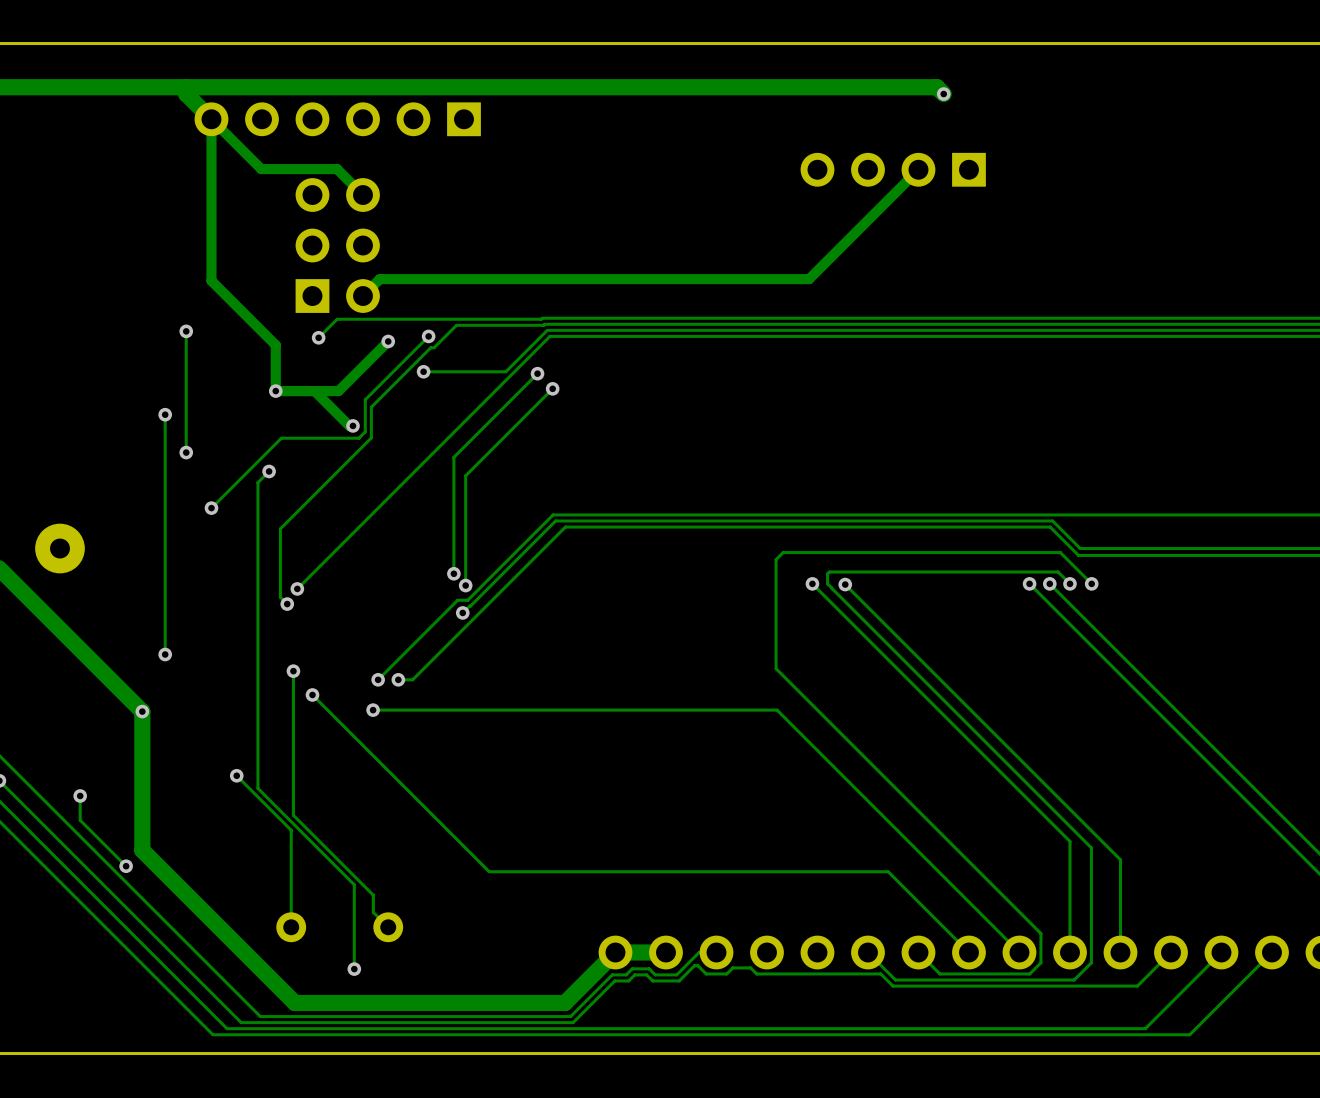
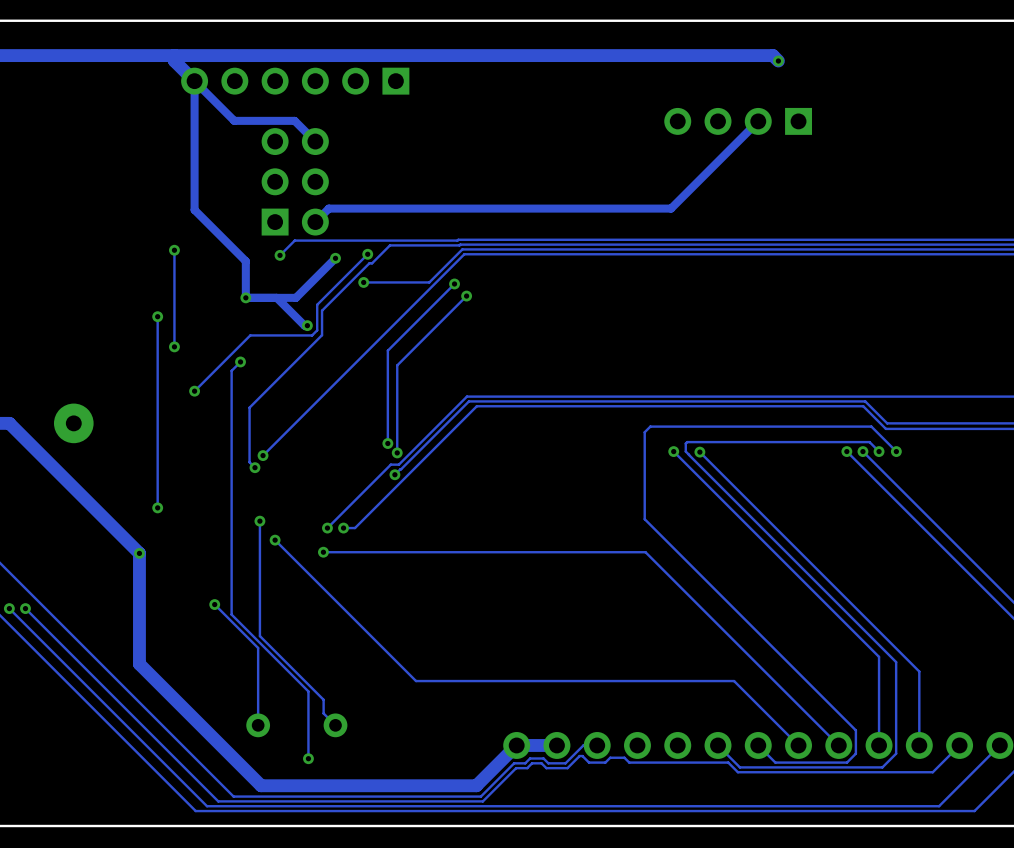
track: (80, 795) (80, 820) (126, 866) -> none
via: (80, 795) -> none
via: (126, 866) -> none

